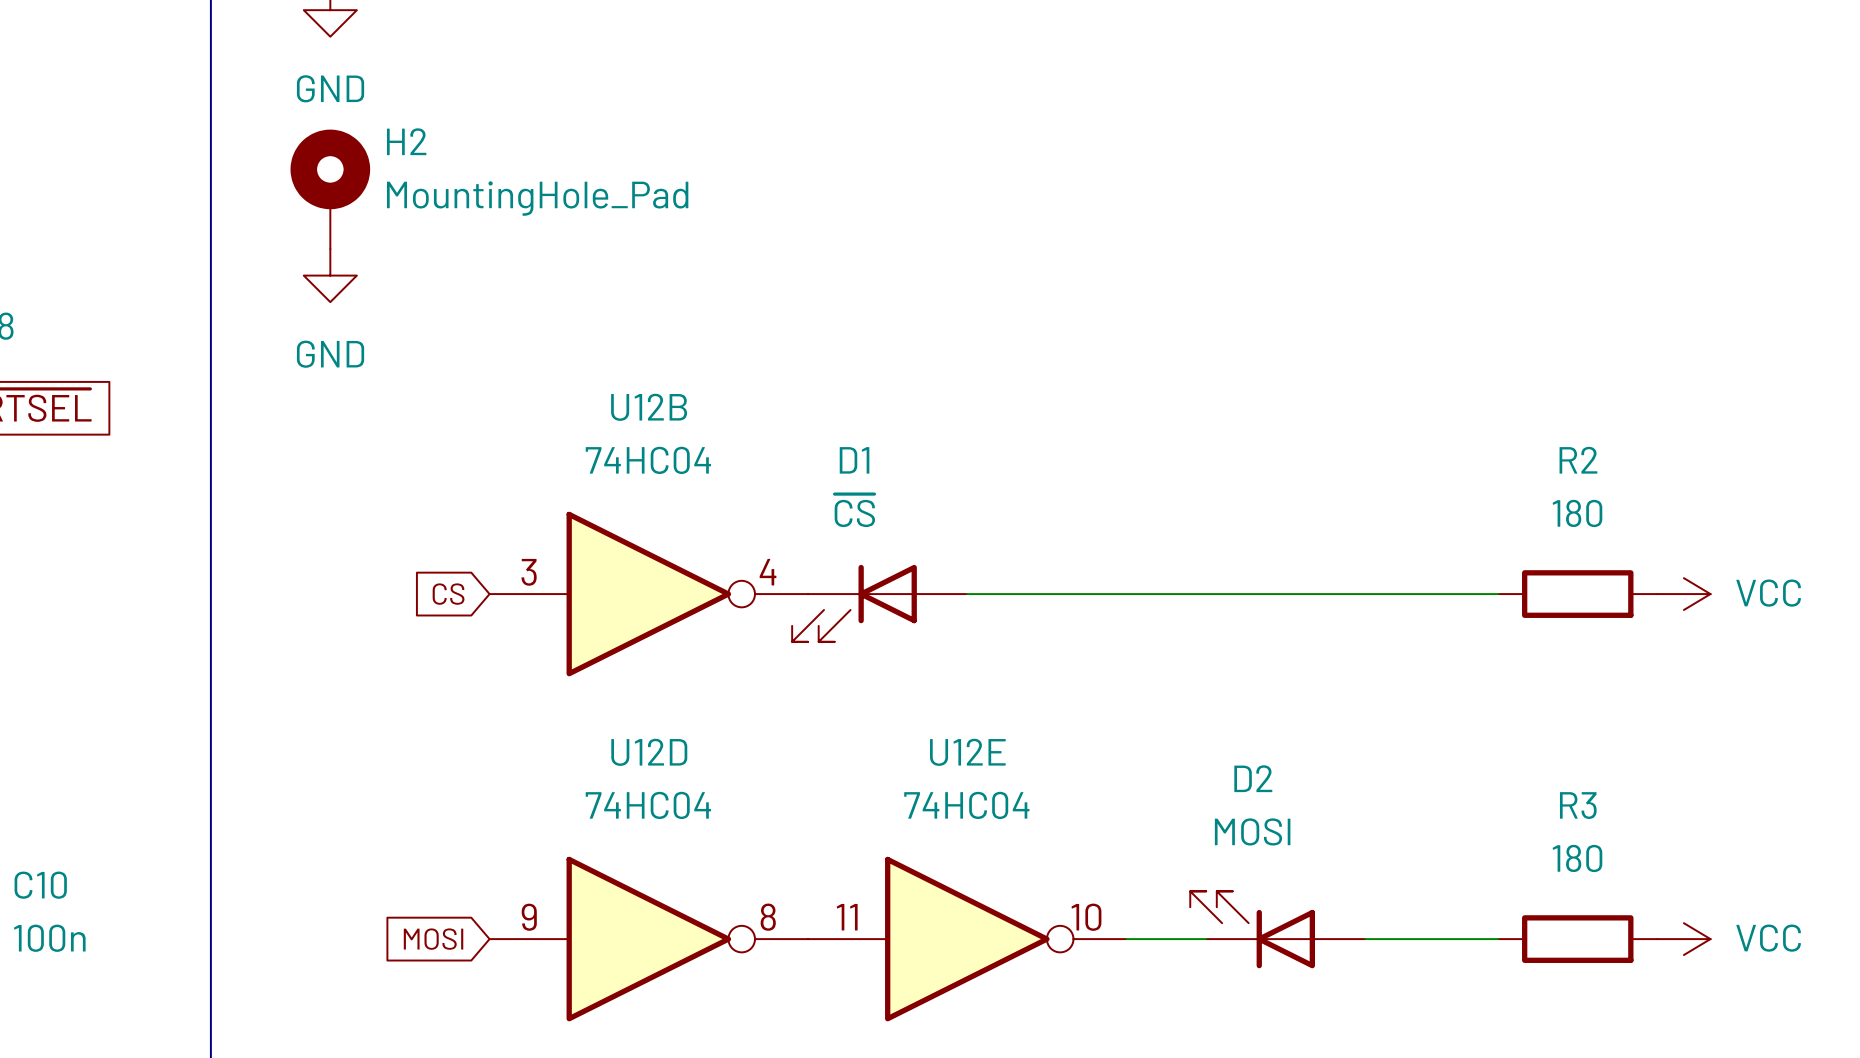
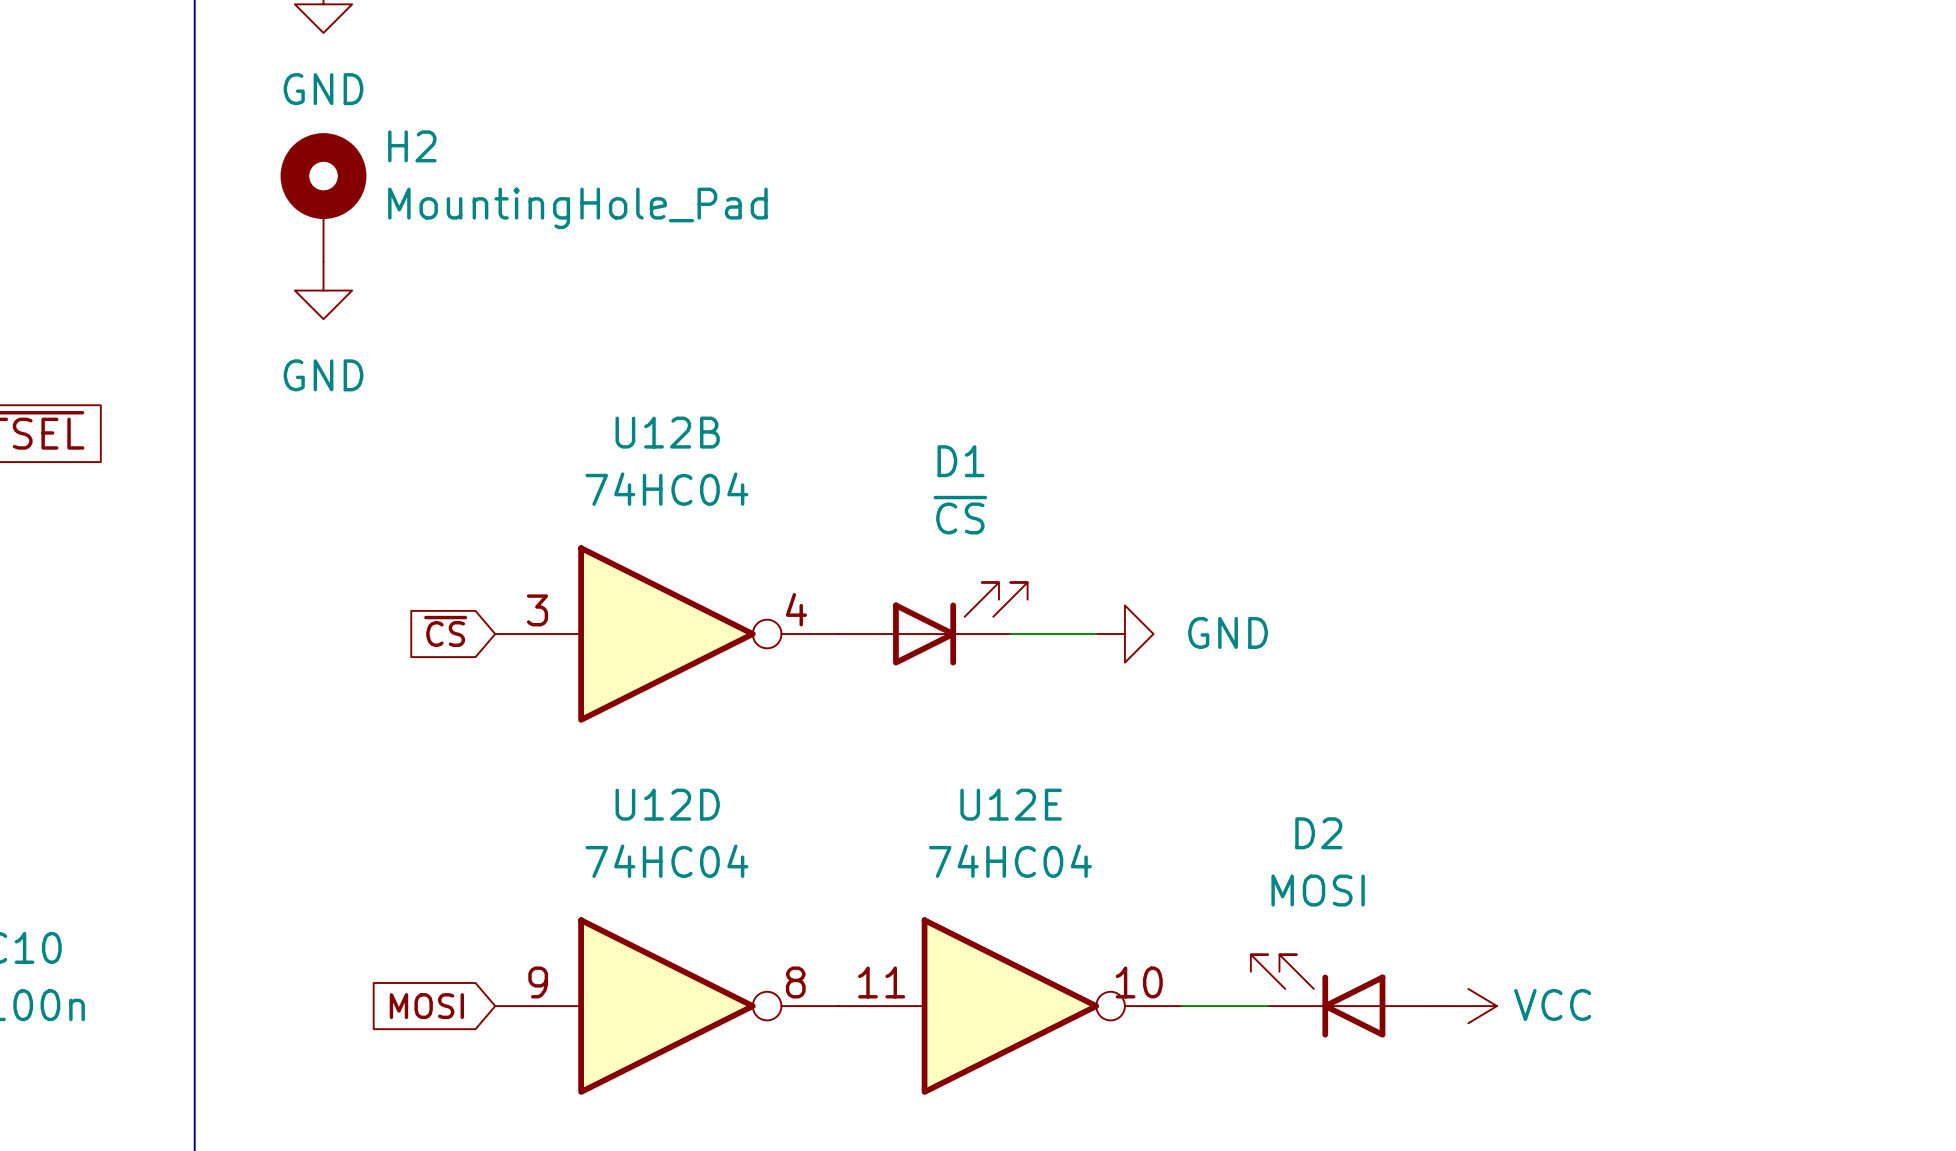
D1 name position: D1 (854, 460) -> D1 (961, 461)
D1 value position: ~{CS} (854, 510) -> ~{CS} (960, 515)
global label: CS (448, 594) -> ~{CS} (445, 631)
wire: (1046, 594) (1498, 594) -> none
power symbol: none -> GND (1124, 634)
R2: 180 (1577, 594) -> none
power symbol: VCC (1683, 594) -> none
D1 rotation: 0° (854, 603) -> 180° (960, 623)
wire: (1365, 939) (1498, 939) -> none
power symbol: none -> VCC (1468, 1006)
R3: 180 (1577, 939) -> none
power symbol: VCC (1683, 939) -> none

